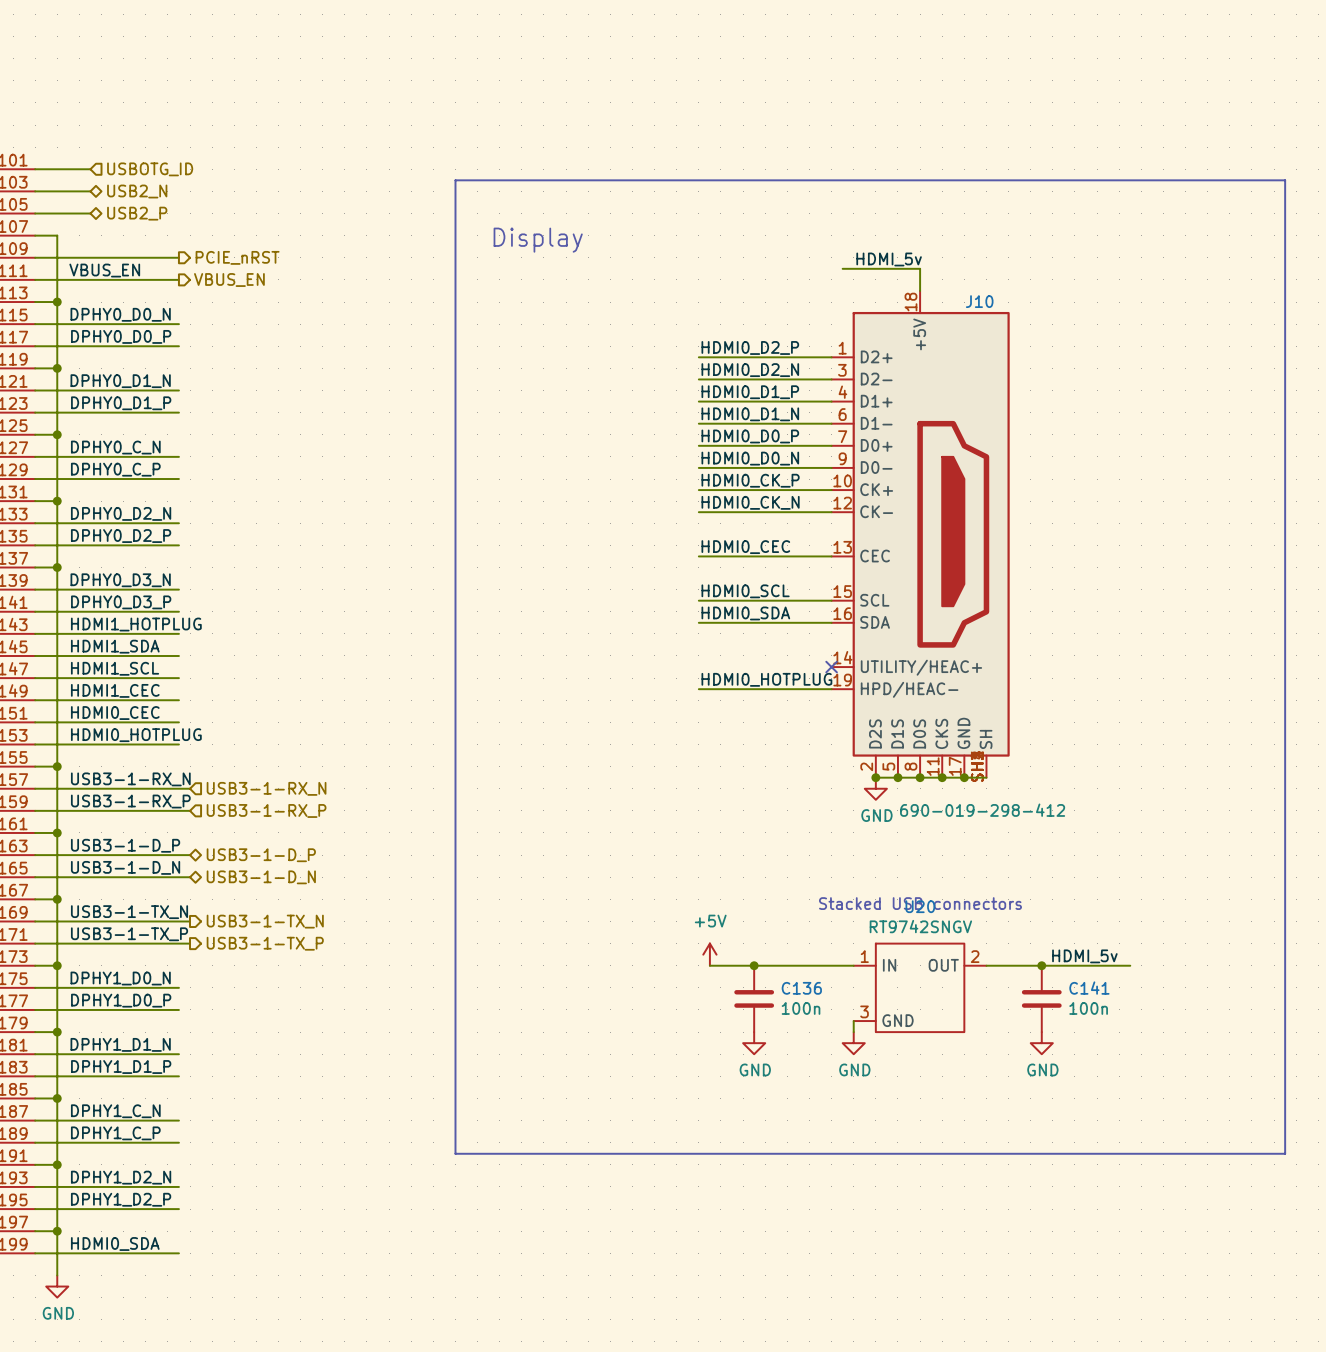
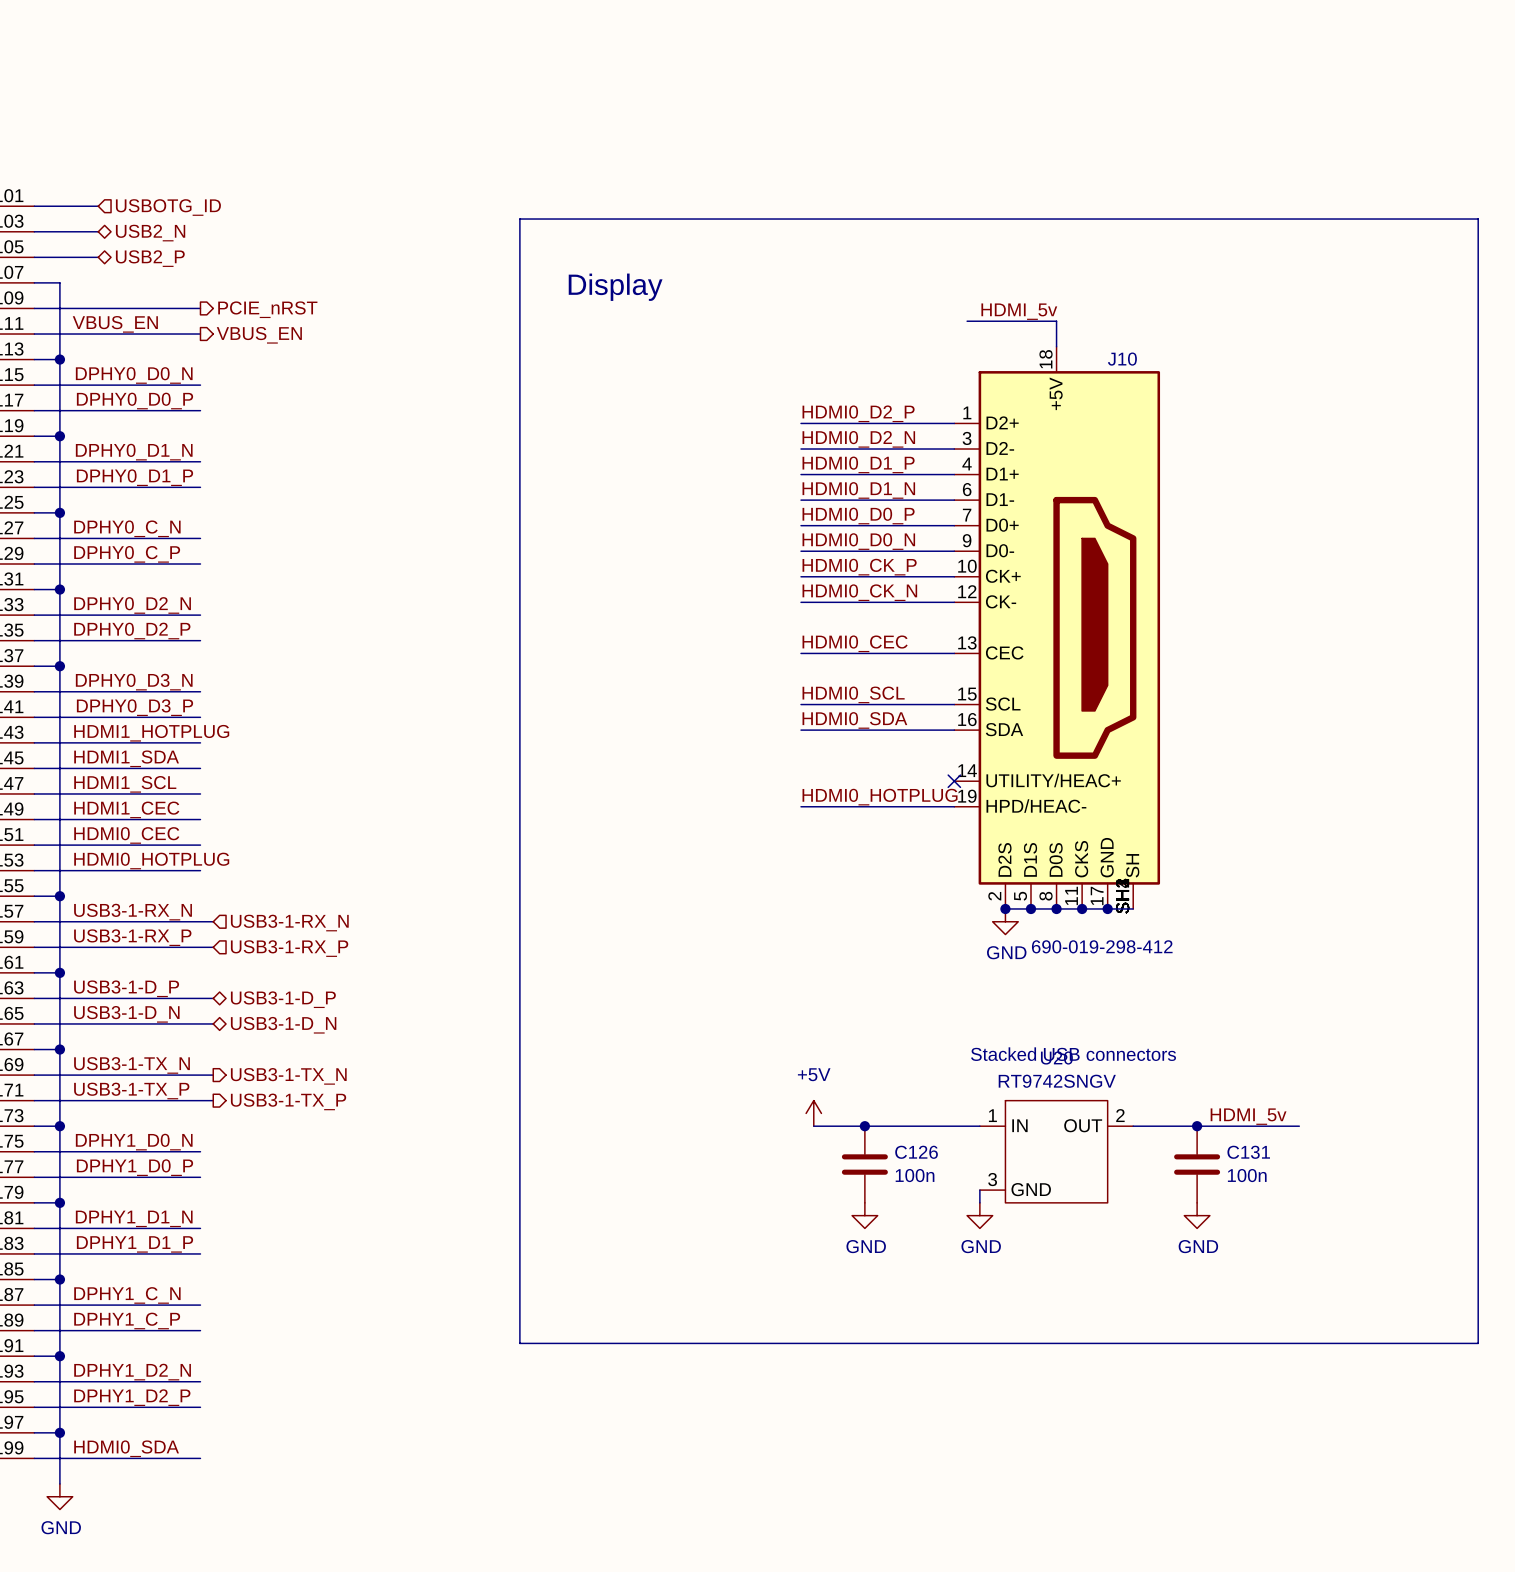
C136 name: C136 (801, 988) -> C126 (916, 1152)
C141 name: C141 (1089, 988) -> C131 (1248, 1152)

